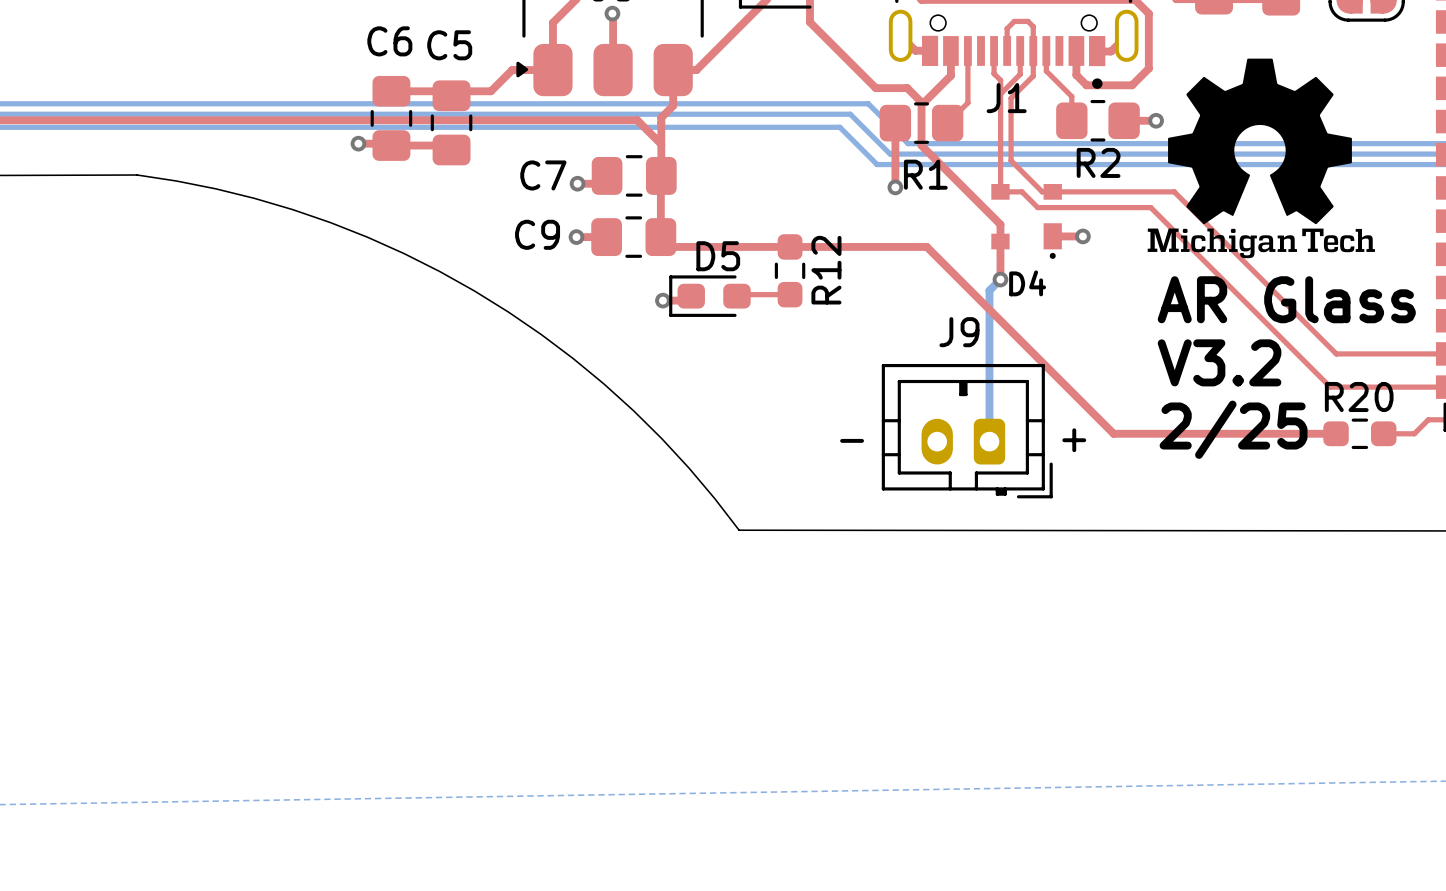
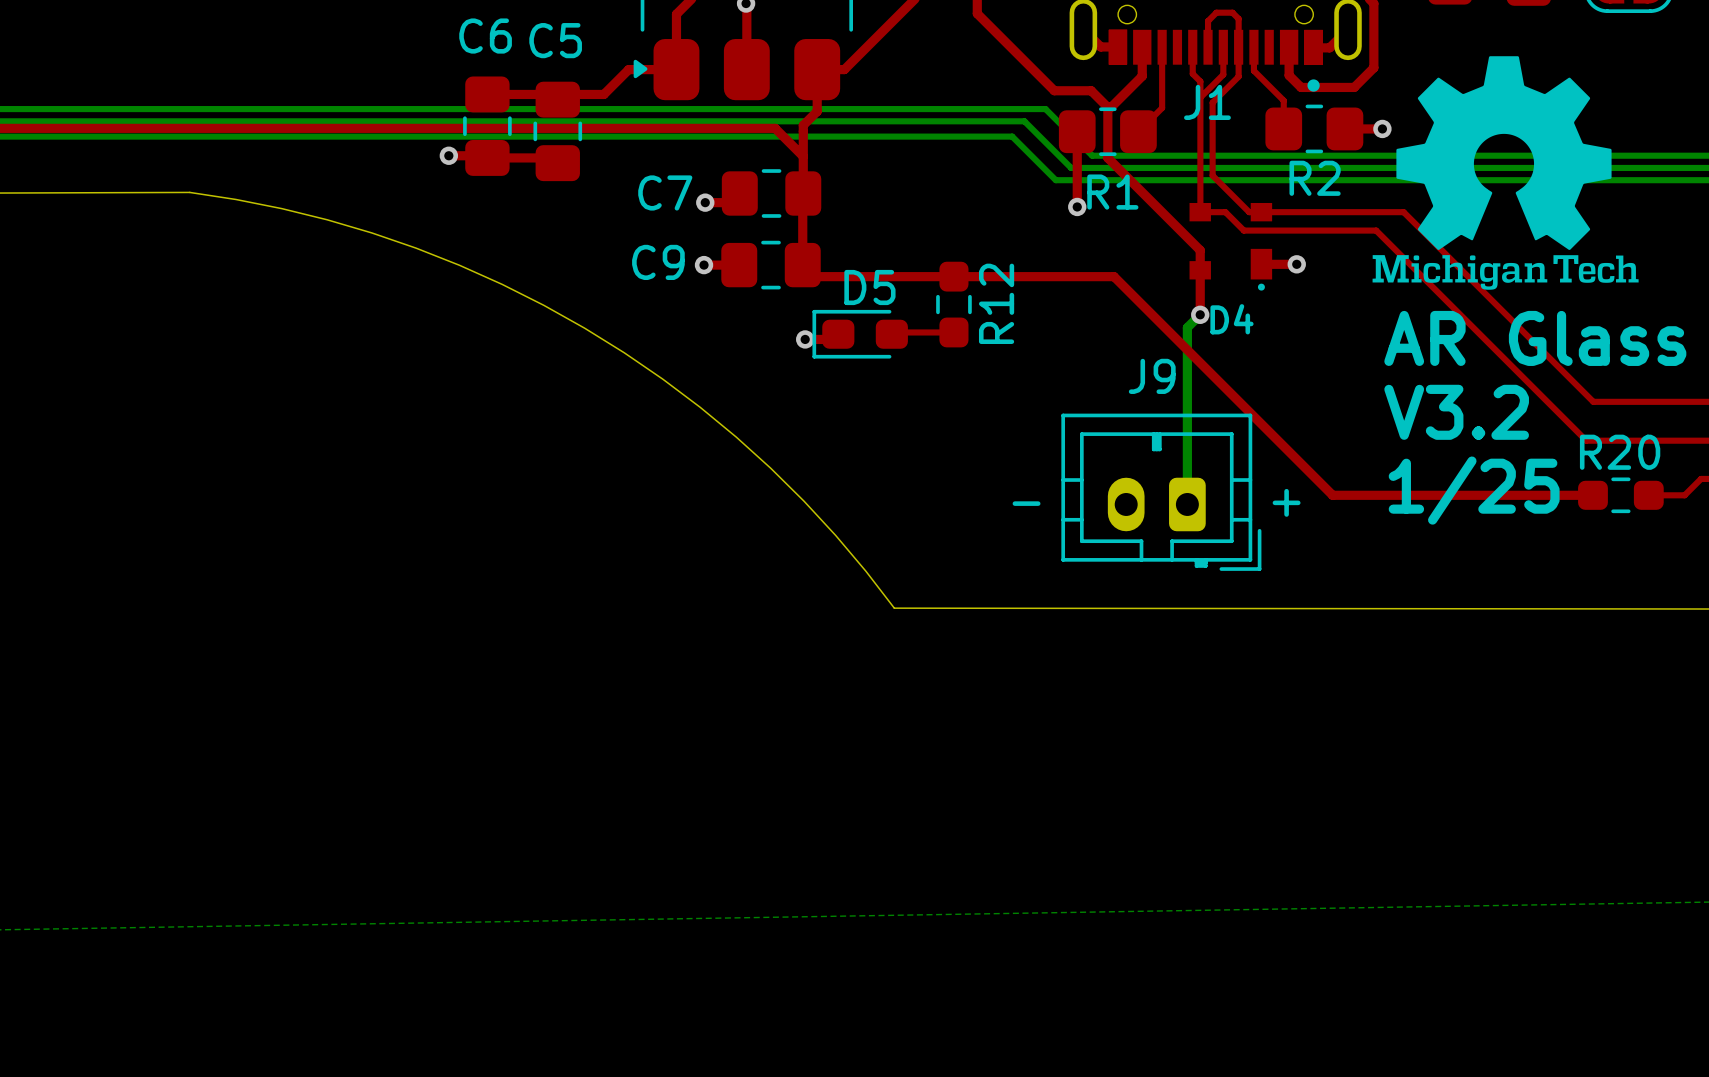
text: 2/25 (1233, 429) -> 1/25 (1474, 490)

